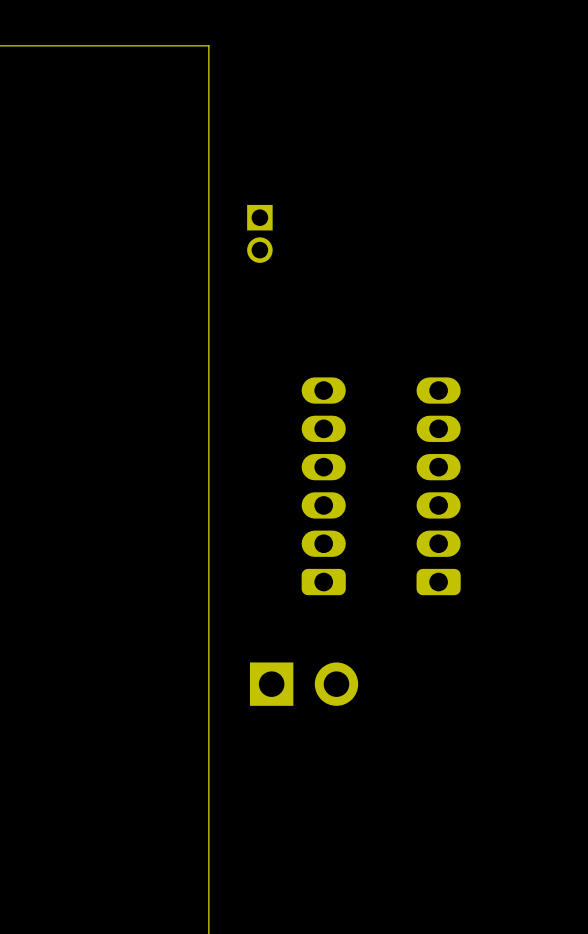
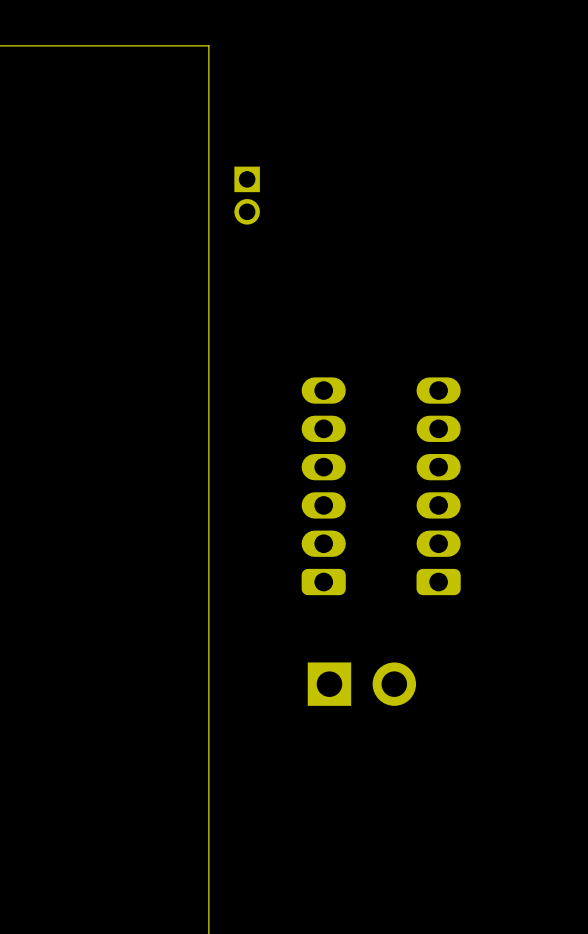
part position: (259, 233) -> (247, 195)
part position: (304, 684) -> (361, 684)

